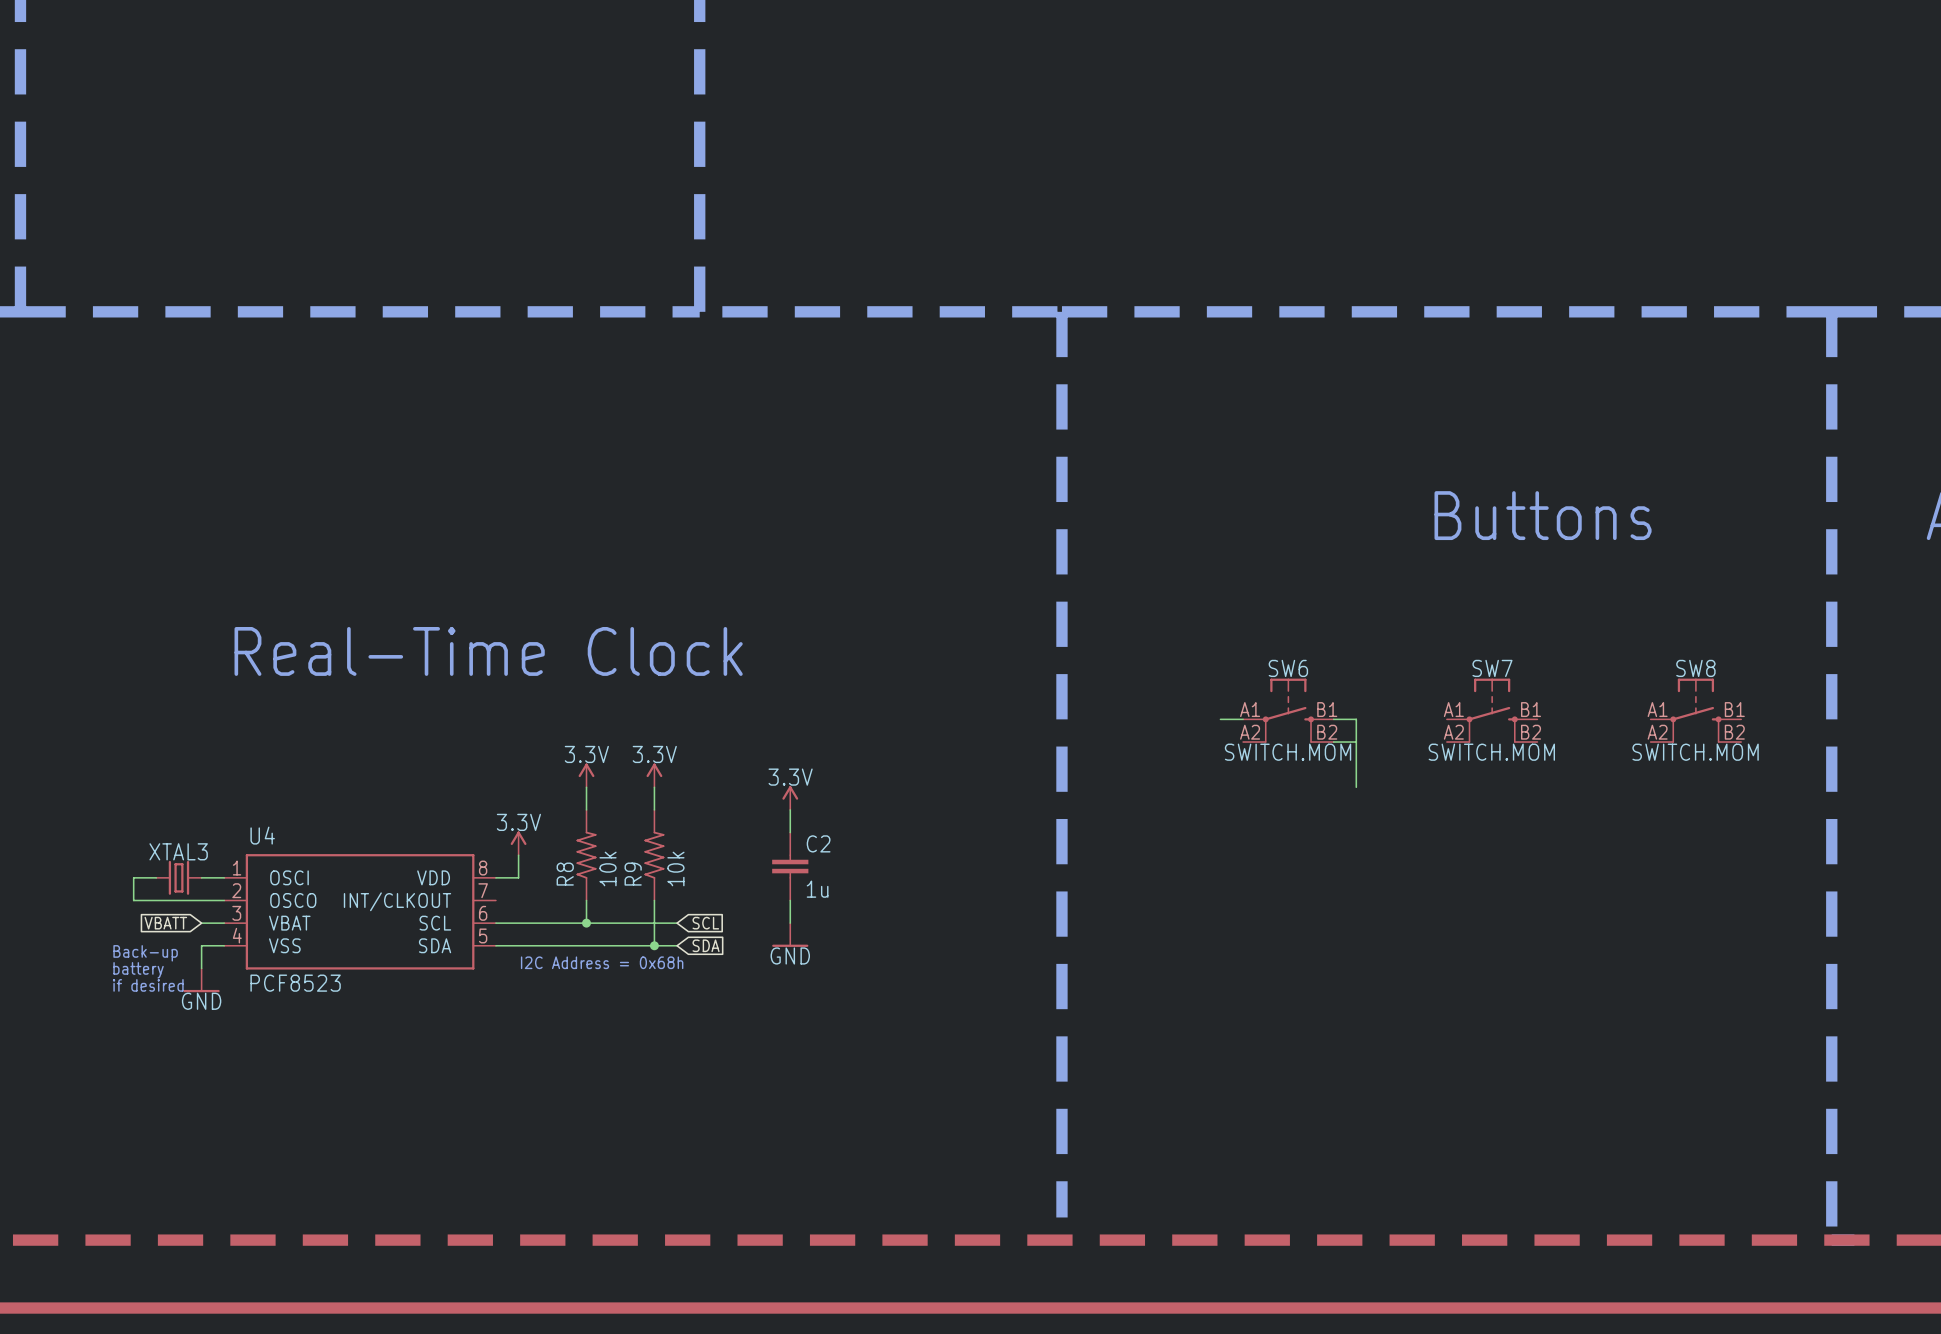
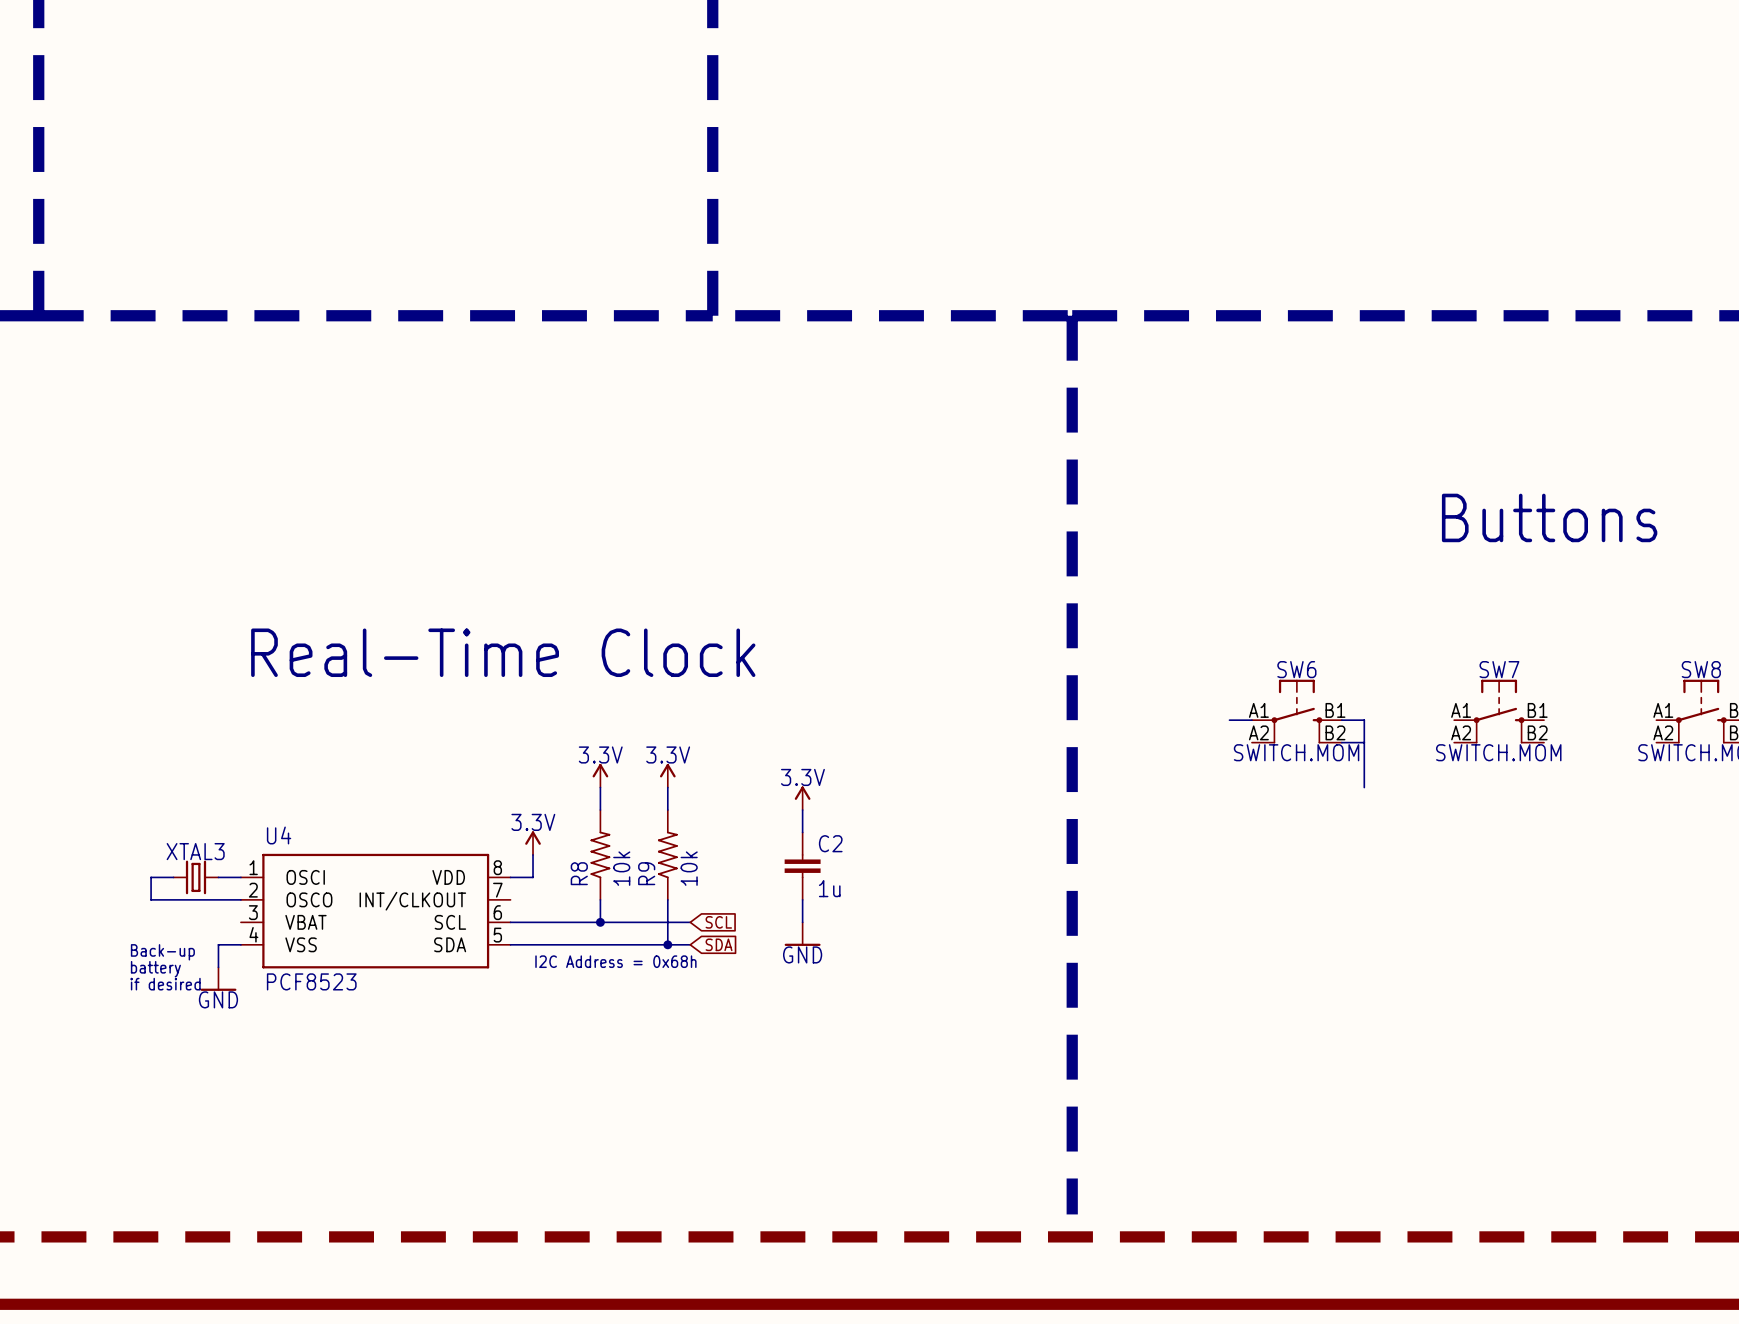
global label: VBATT (165, 923) -> none
wire: (201, 923) (224, 923) -> none

